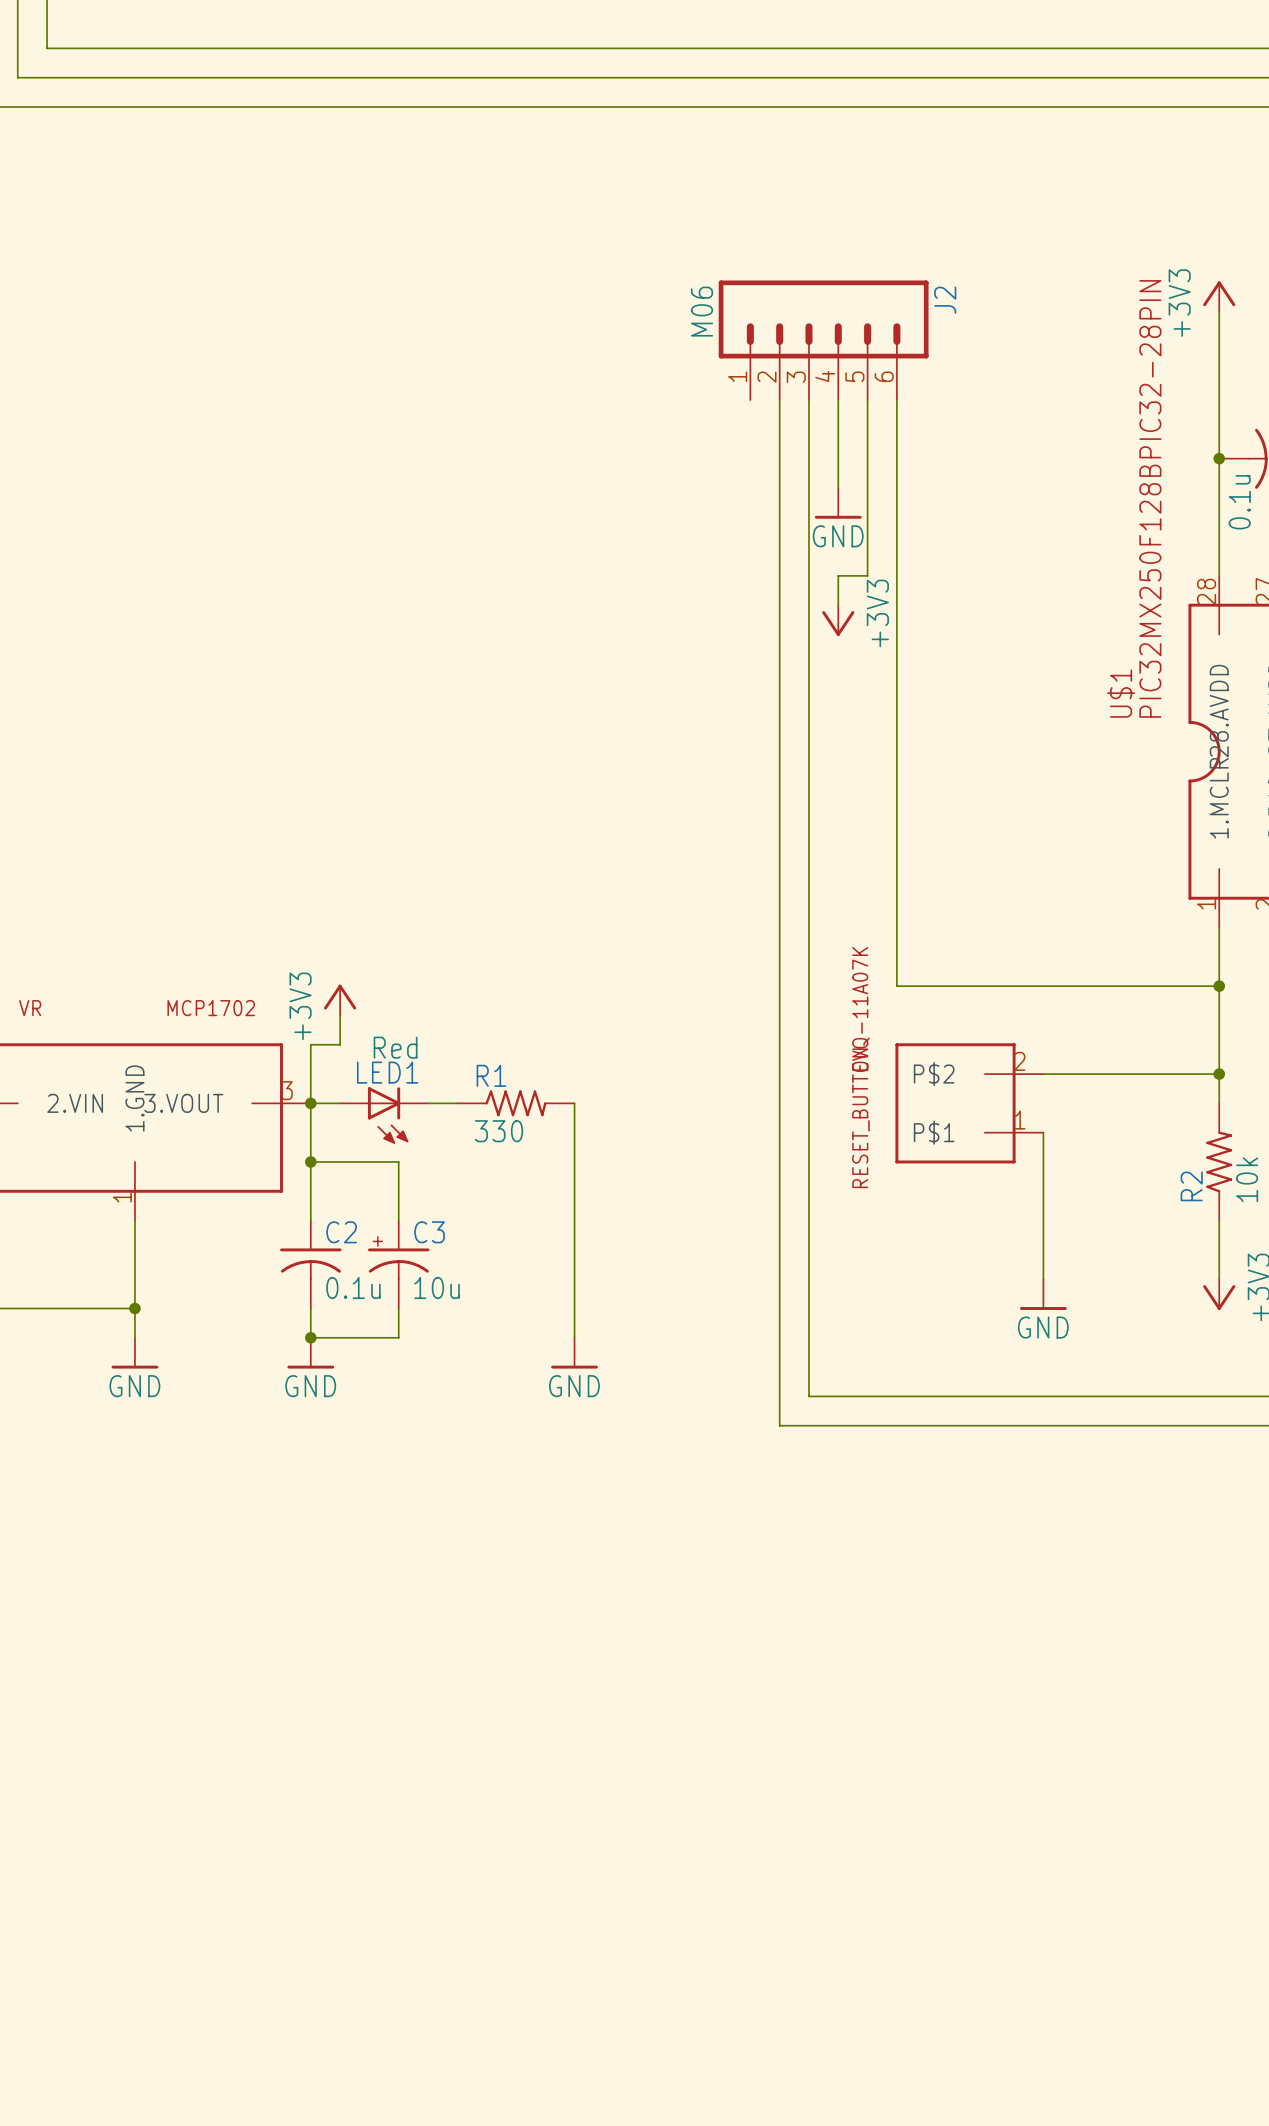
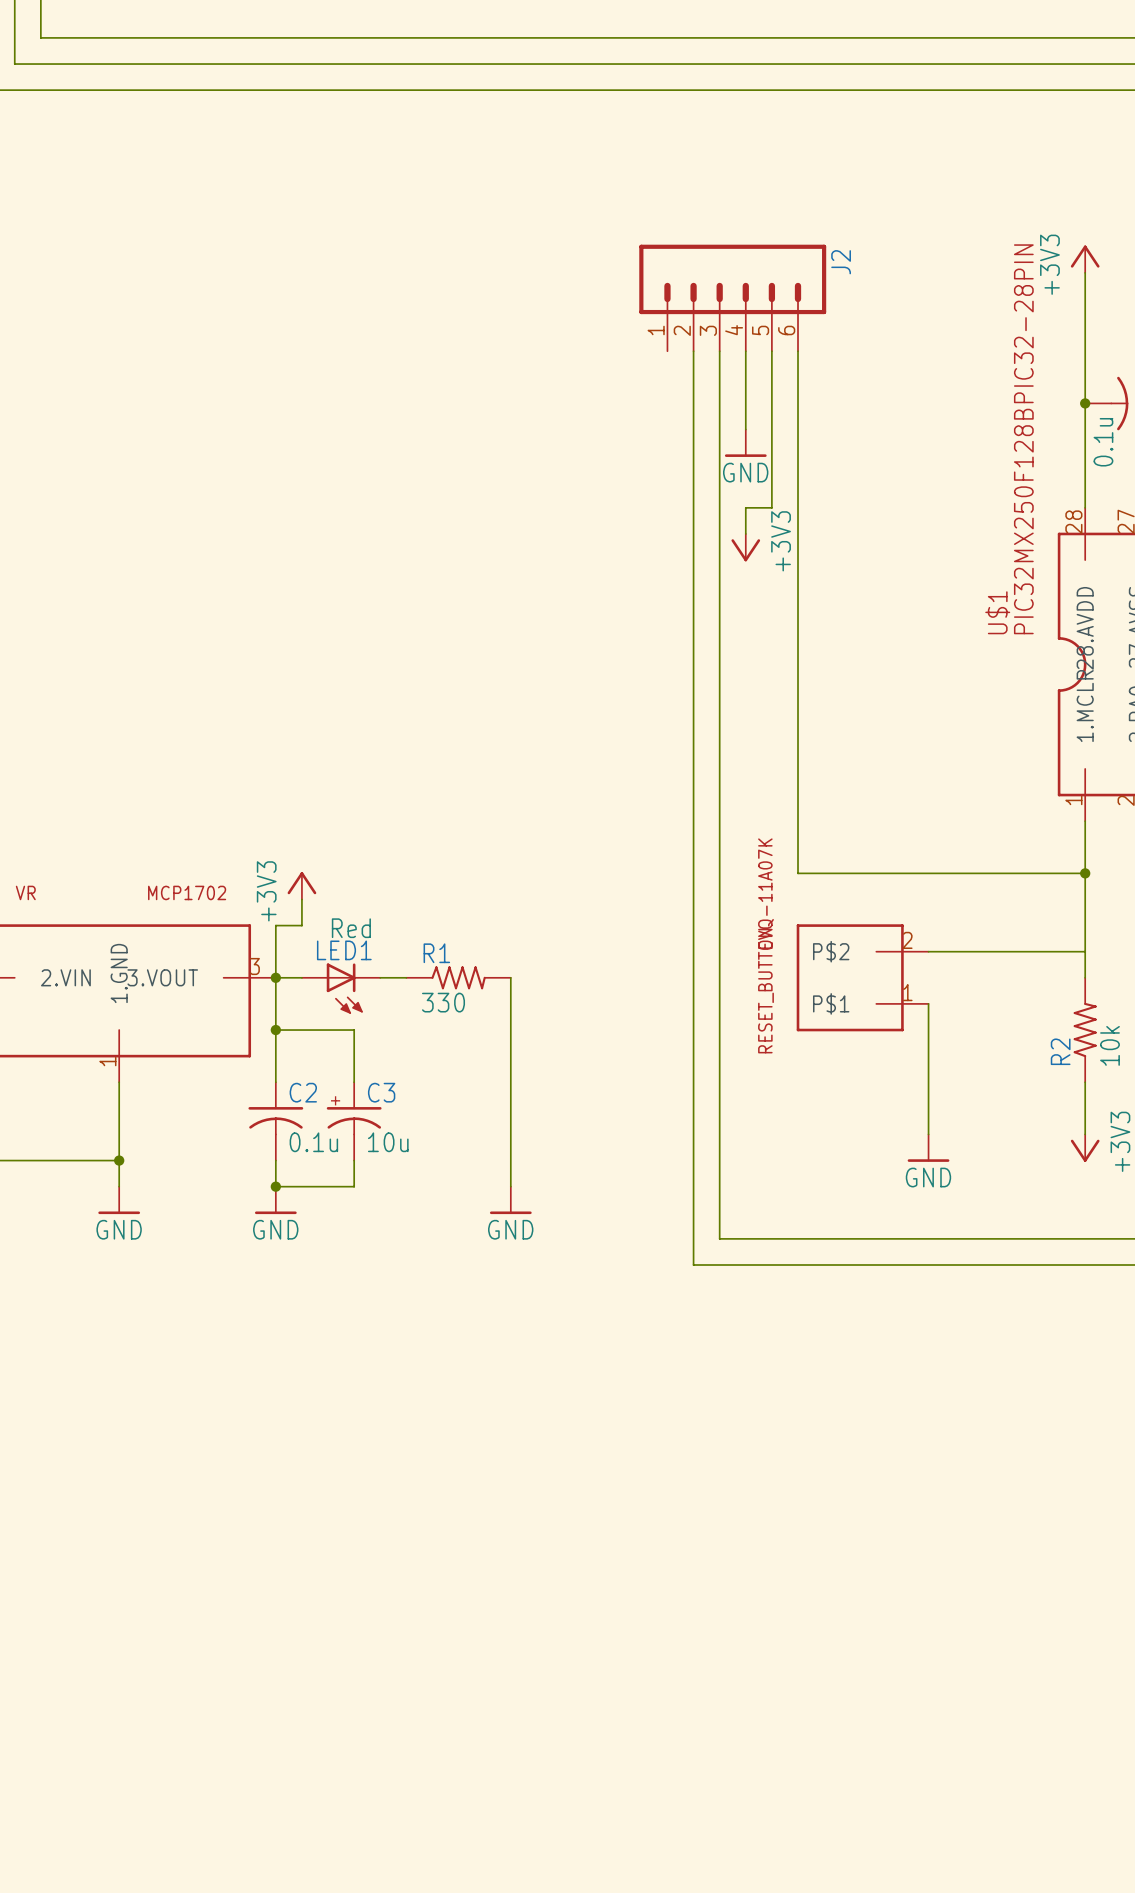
J2 value: M06 (702, 311) -> none
junction: (1219, 1074) -> none

